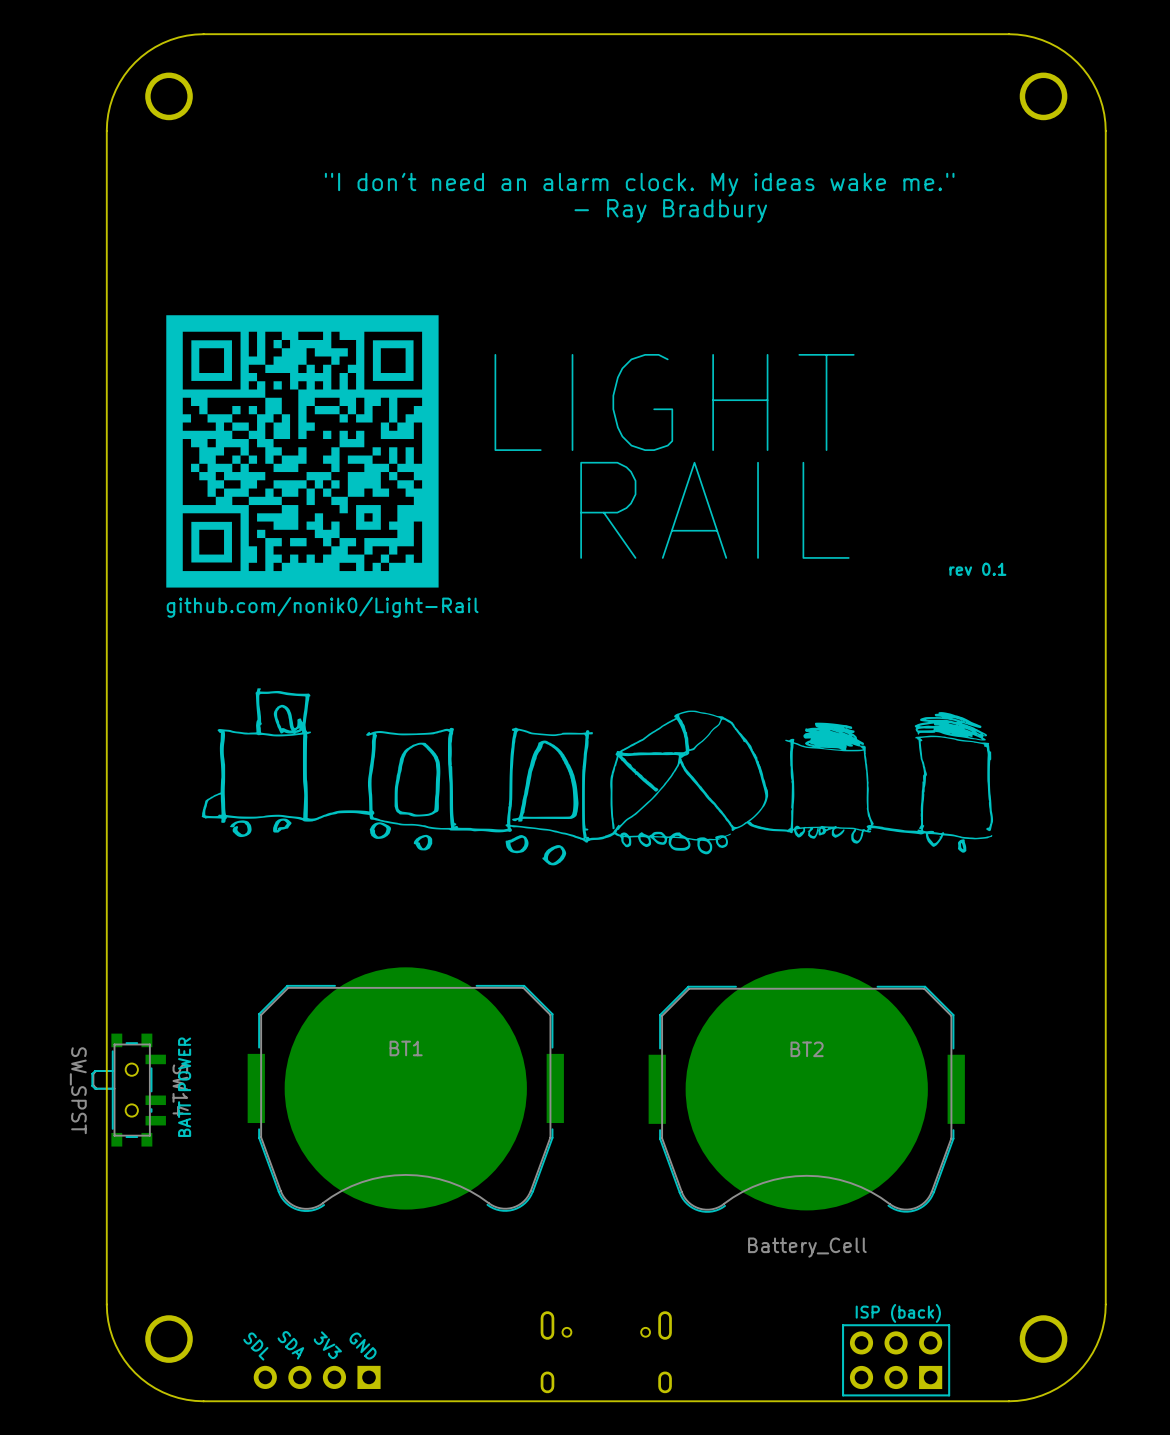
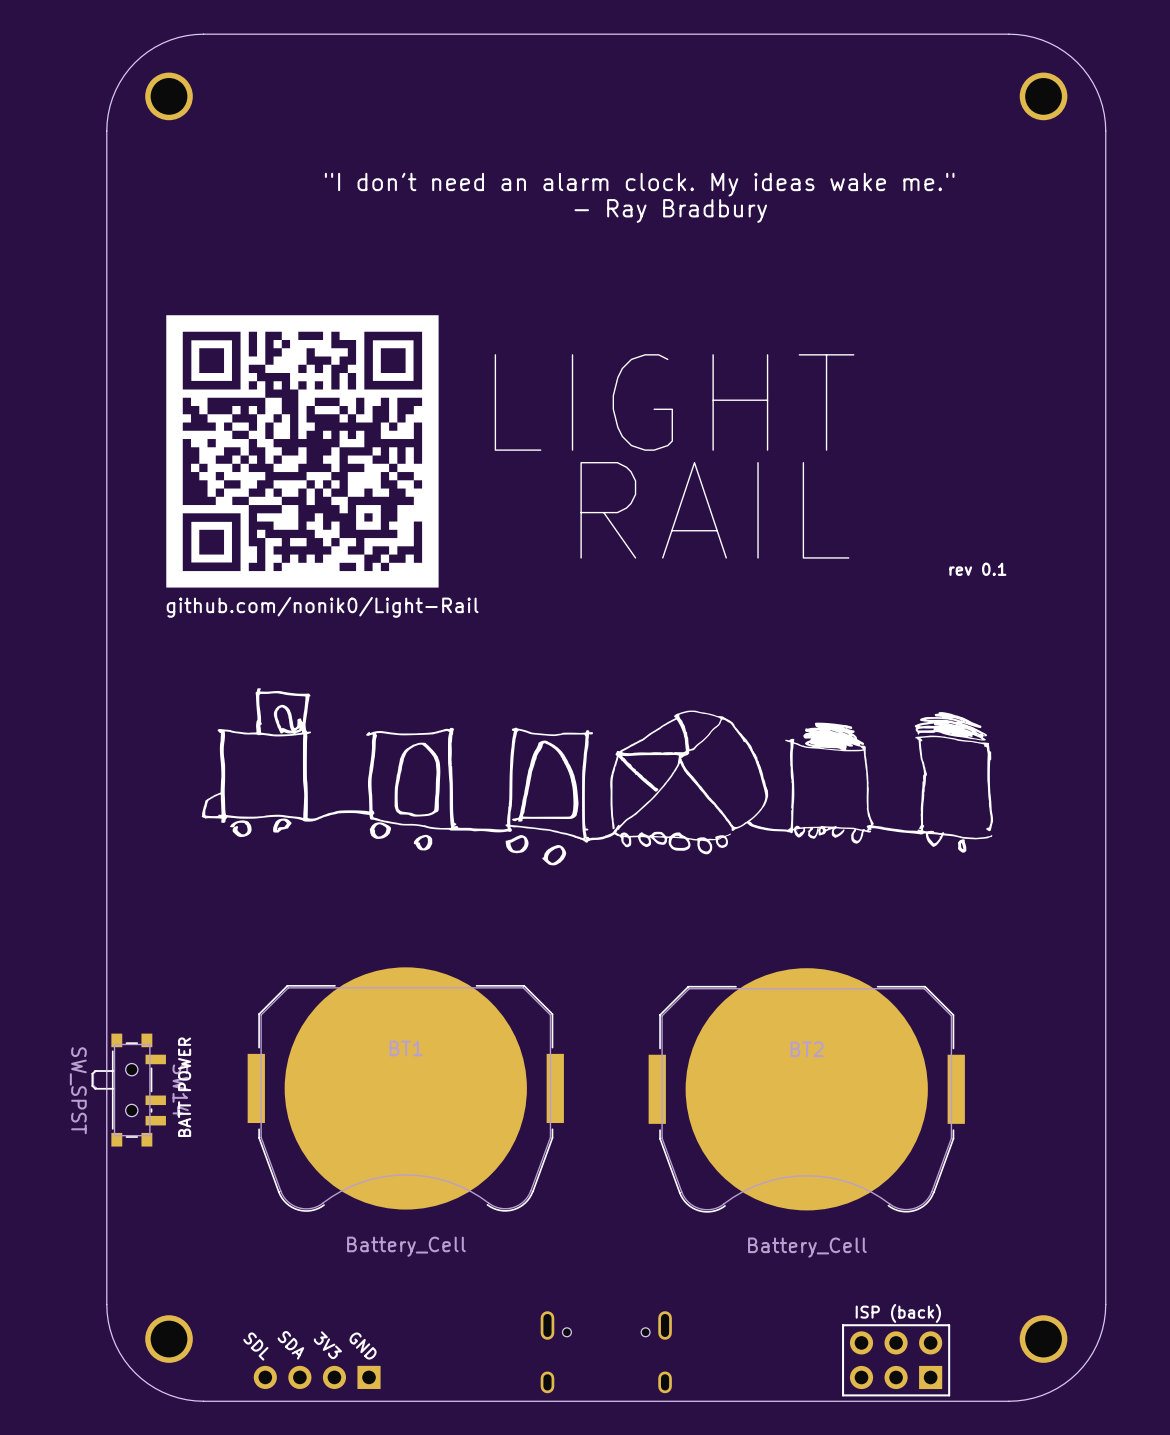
BT1 value: none -> Battery_Cell (406, 1246)

